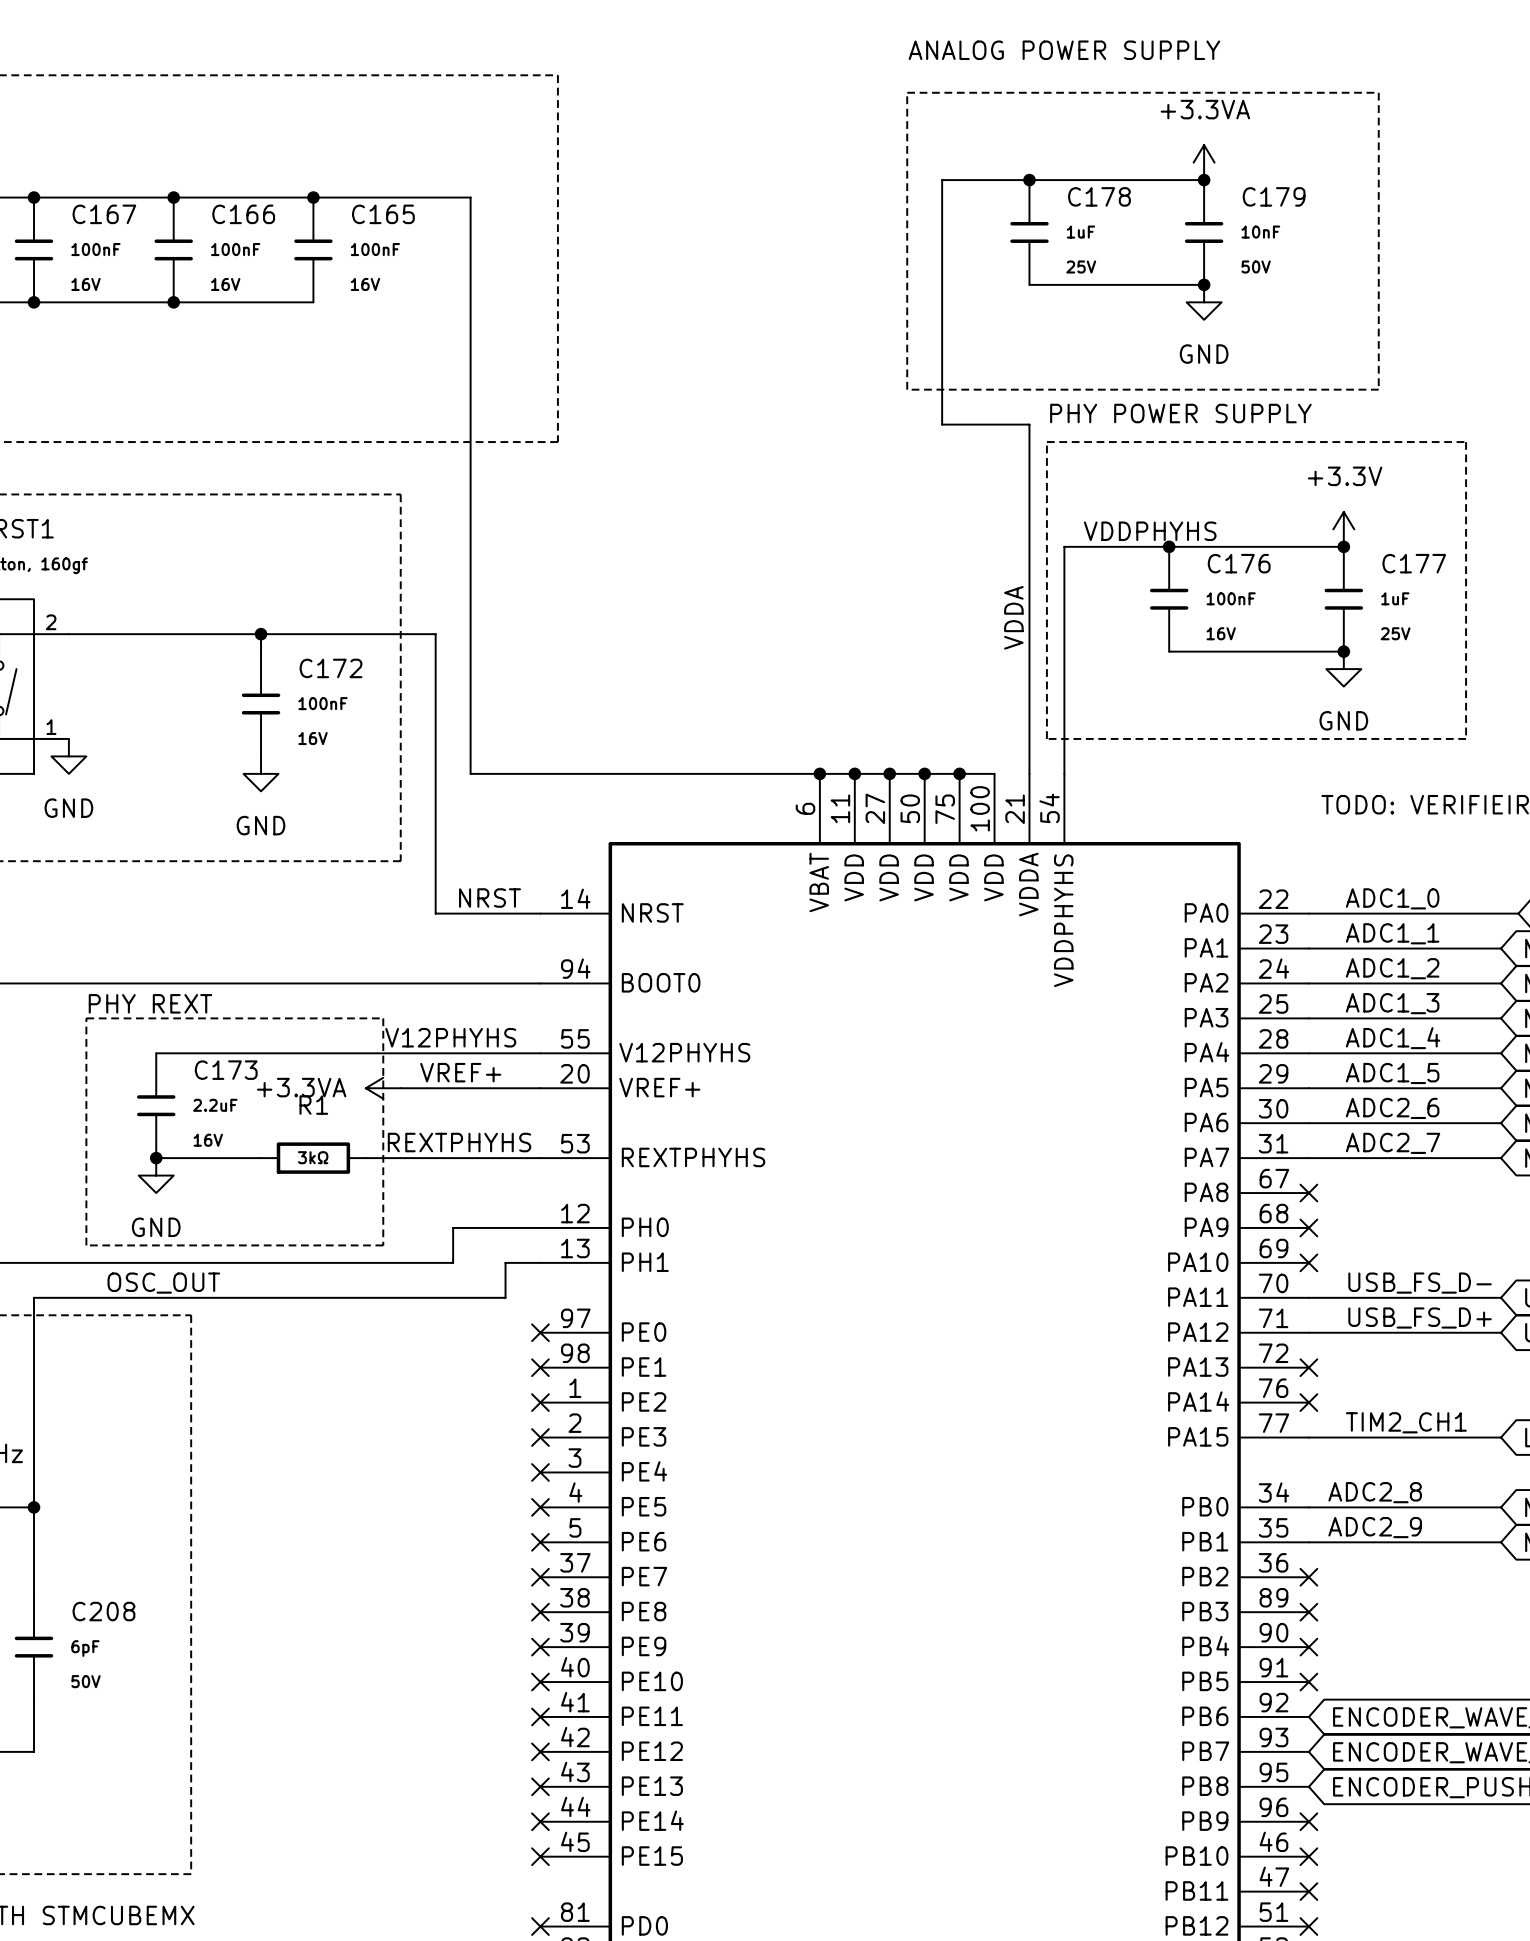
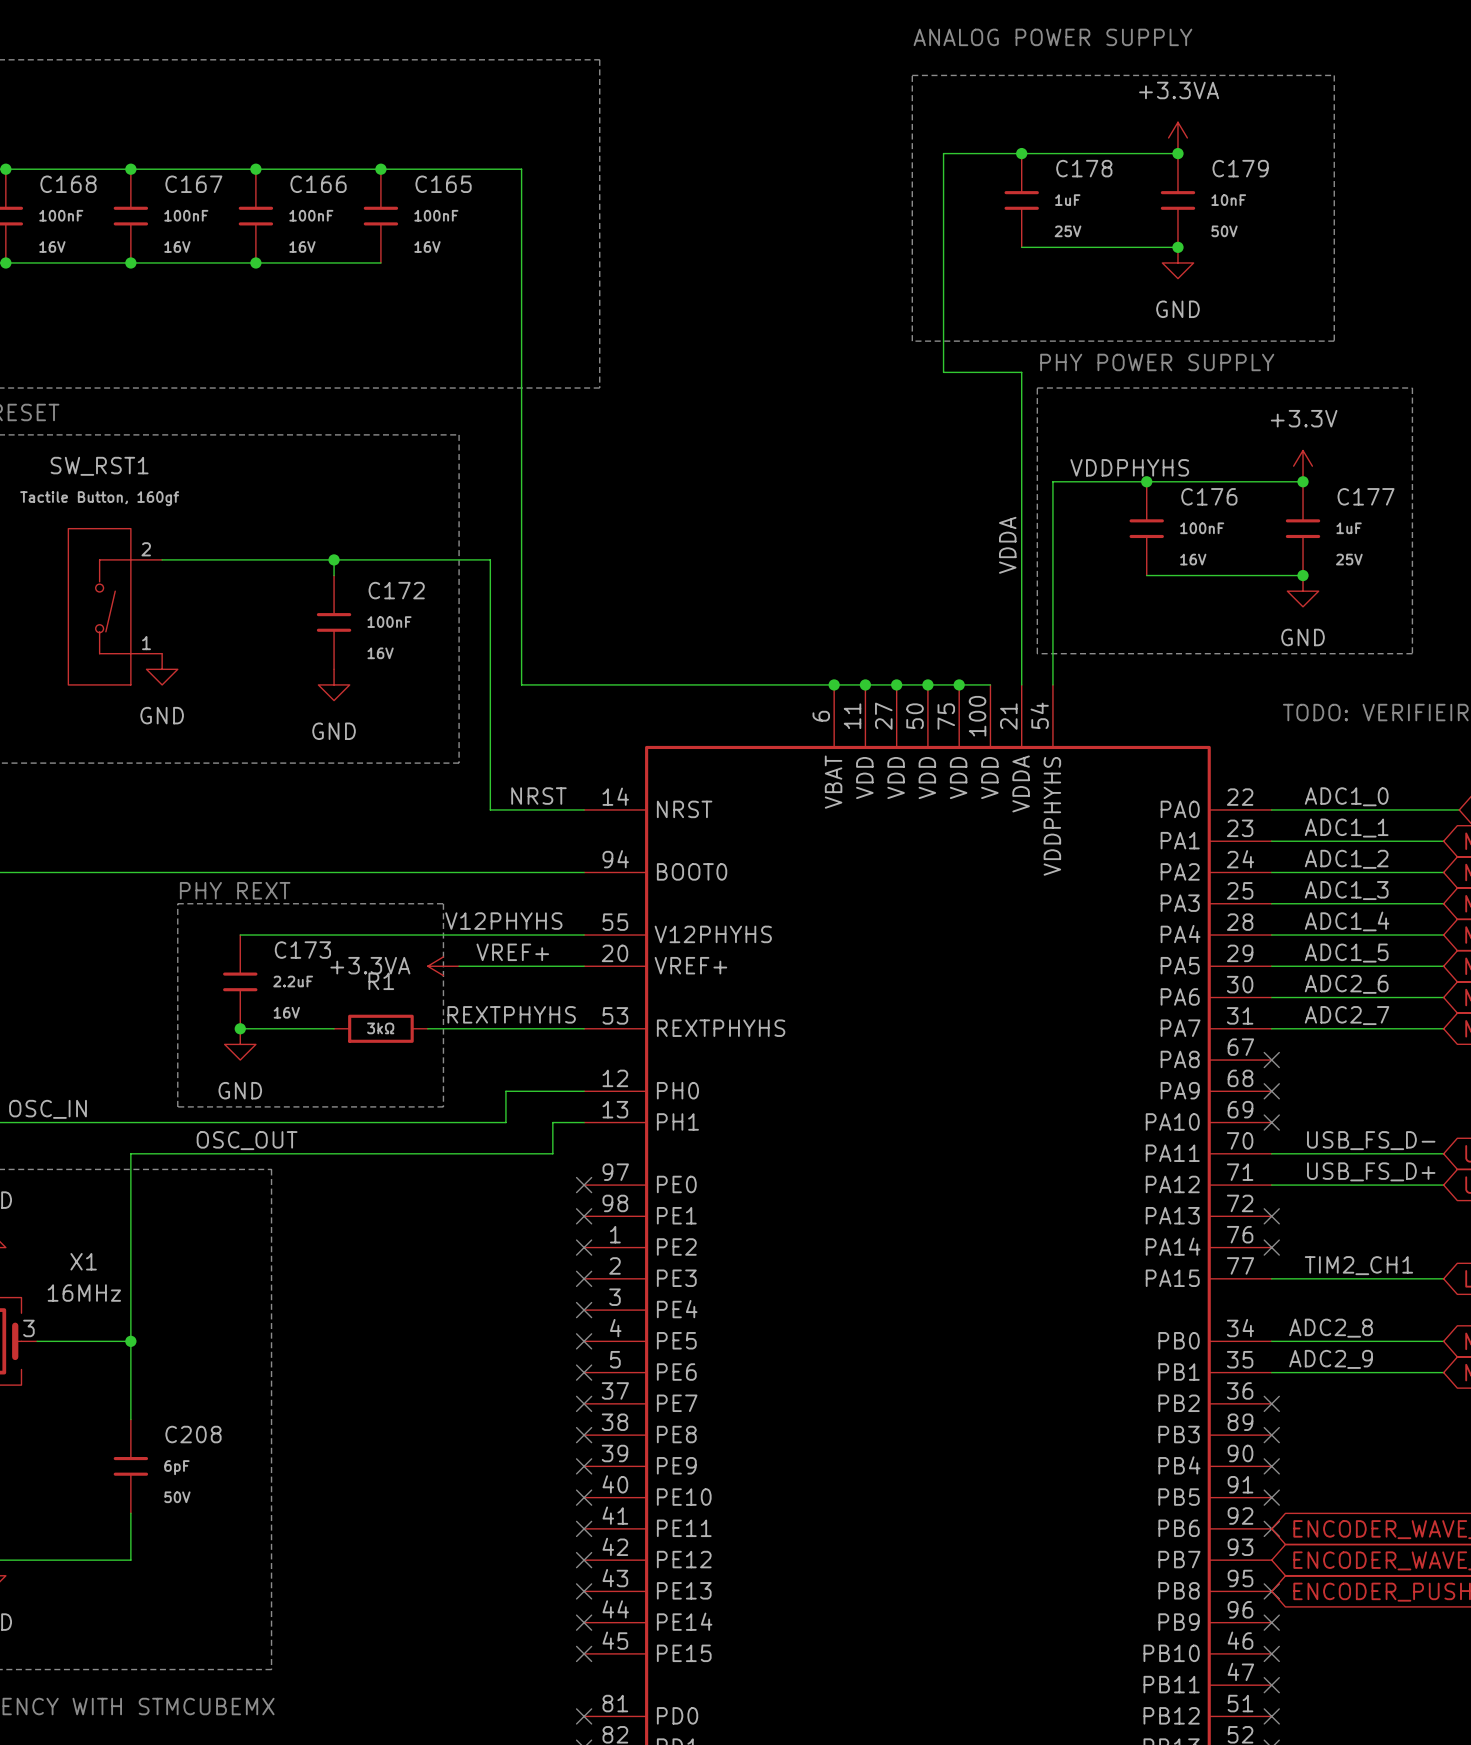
no-connect mark: none -> (1271, 1528)
no-connect mark: none -> (1271, 1591)

